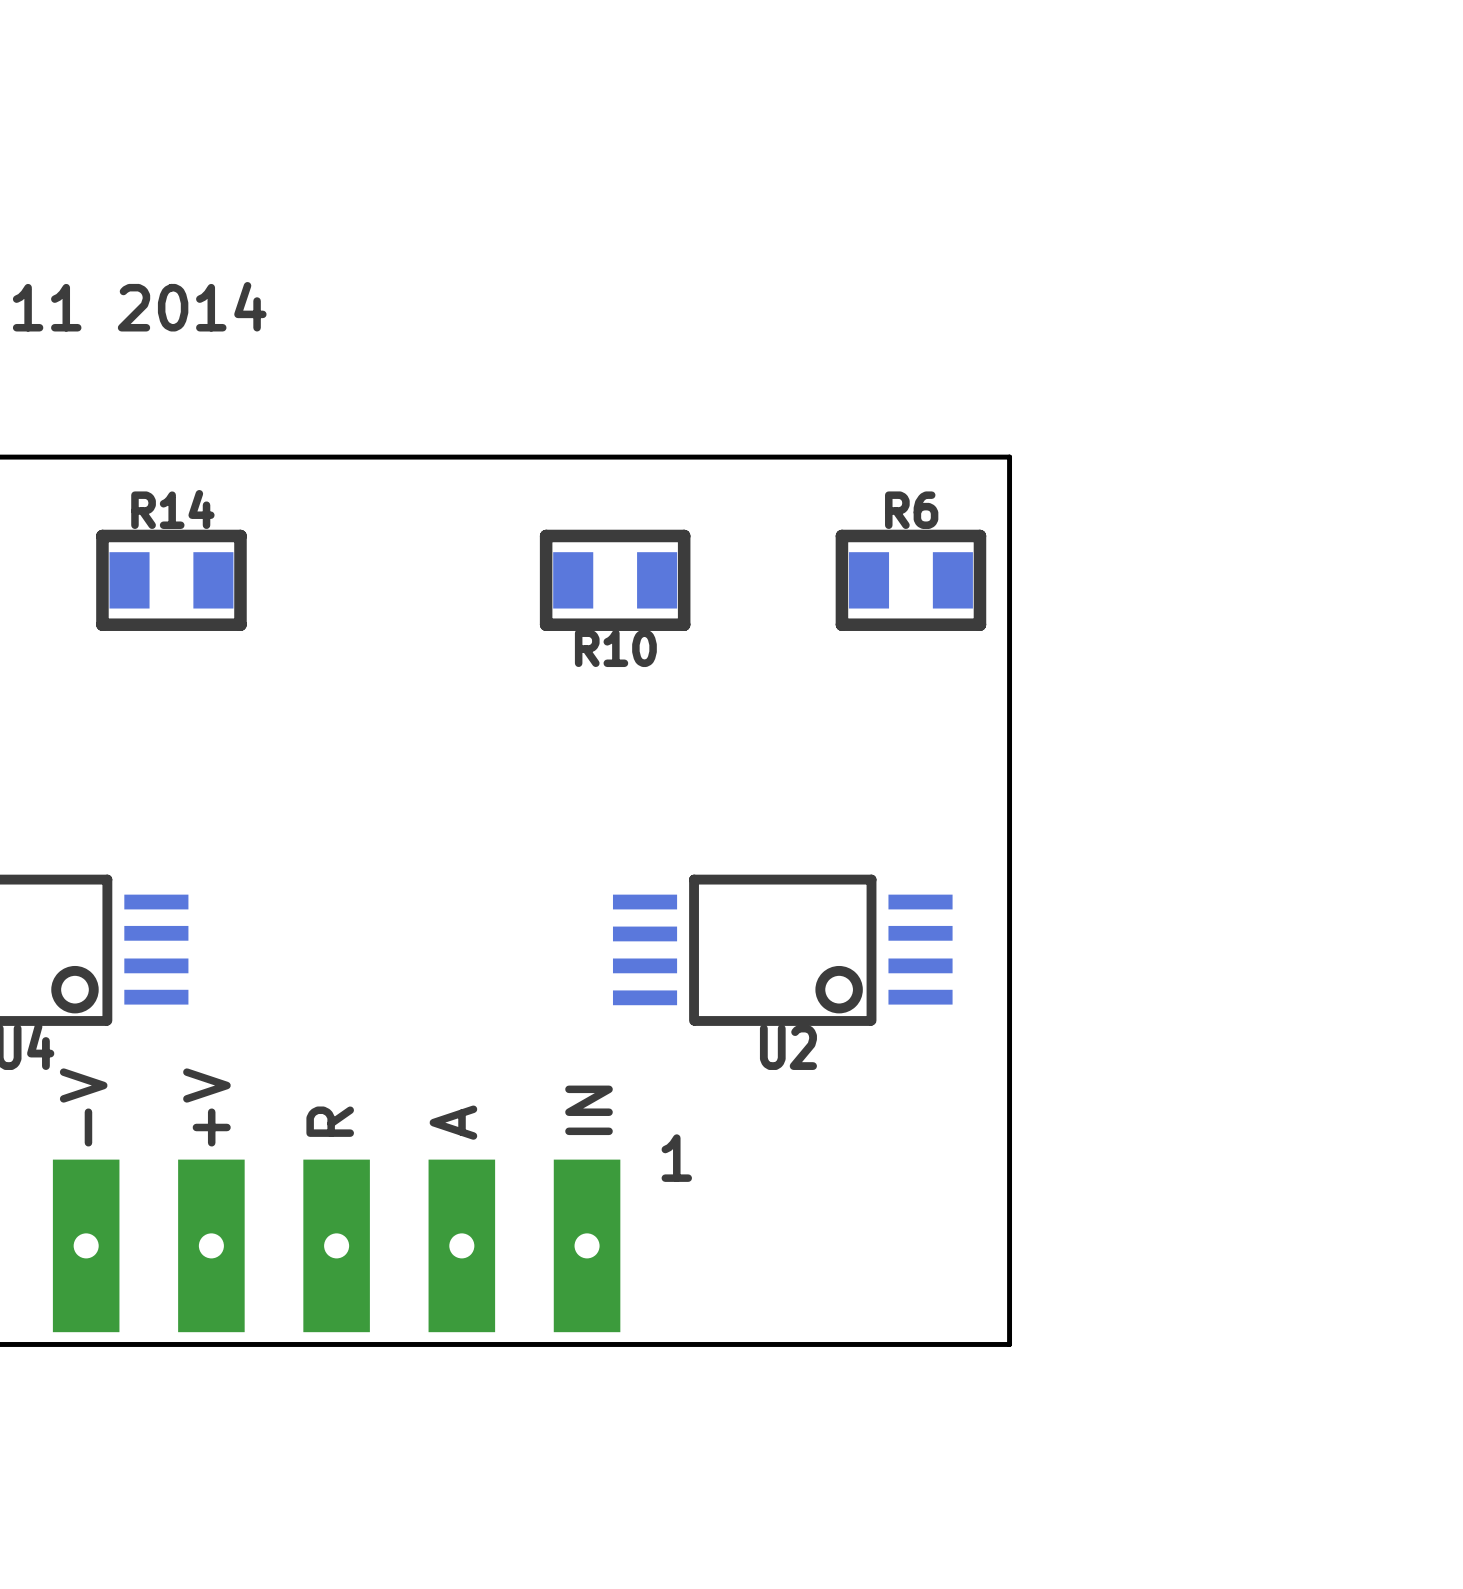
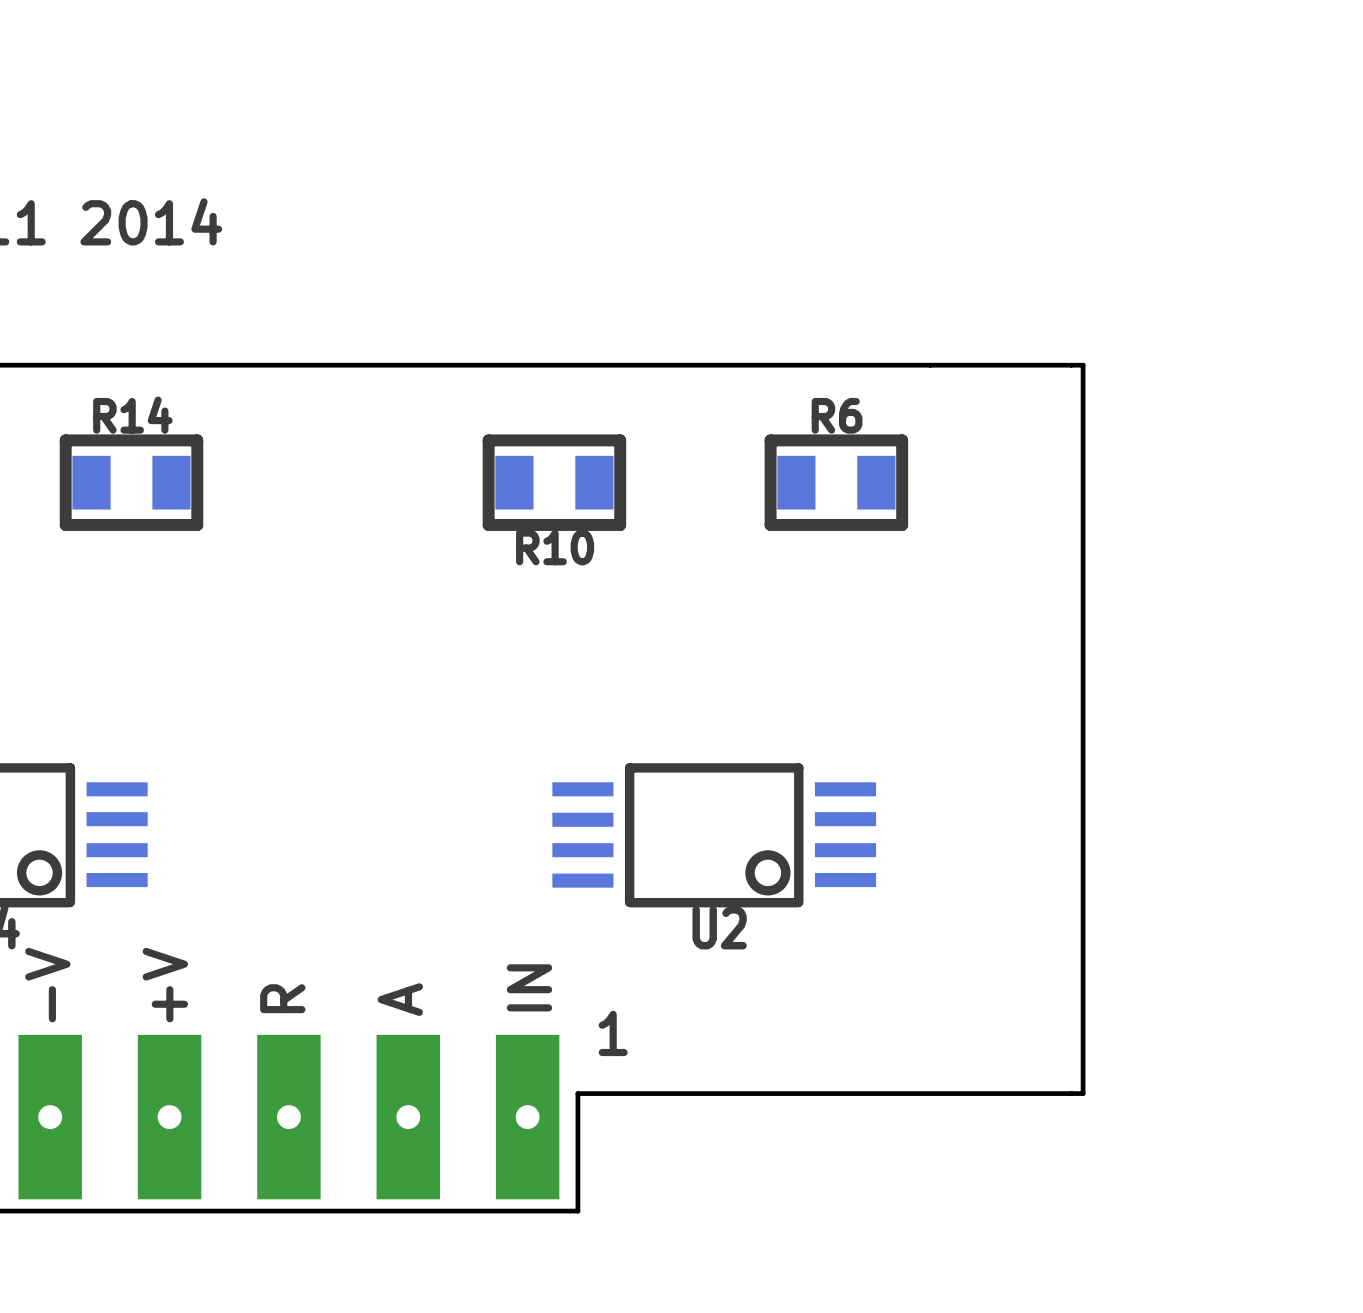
board edge: (1009, 457) (1009, 1344) (639, 1344) -> (930, 365) (1083, 365) (1083, 1093) (577, 1093) (577, 1211)

